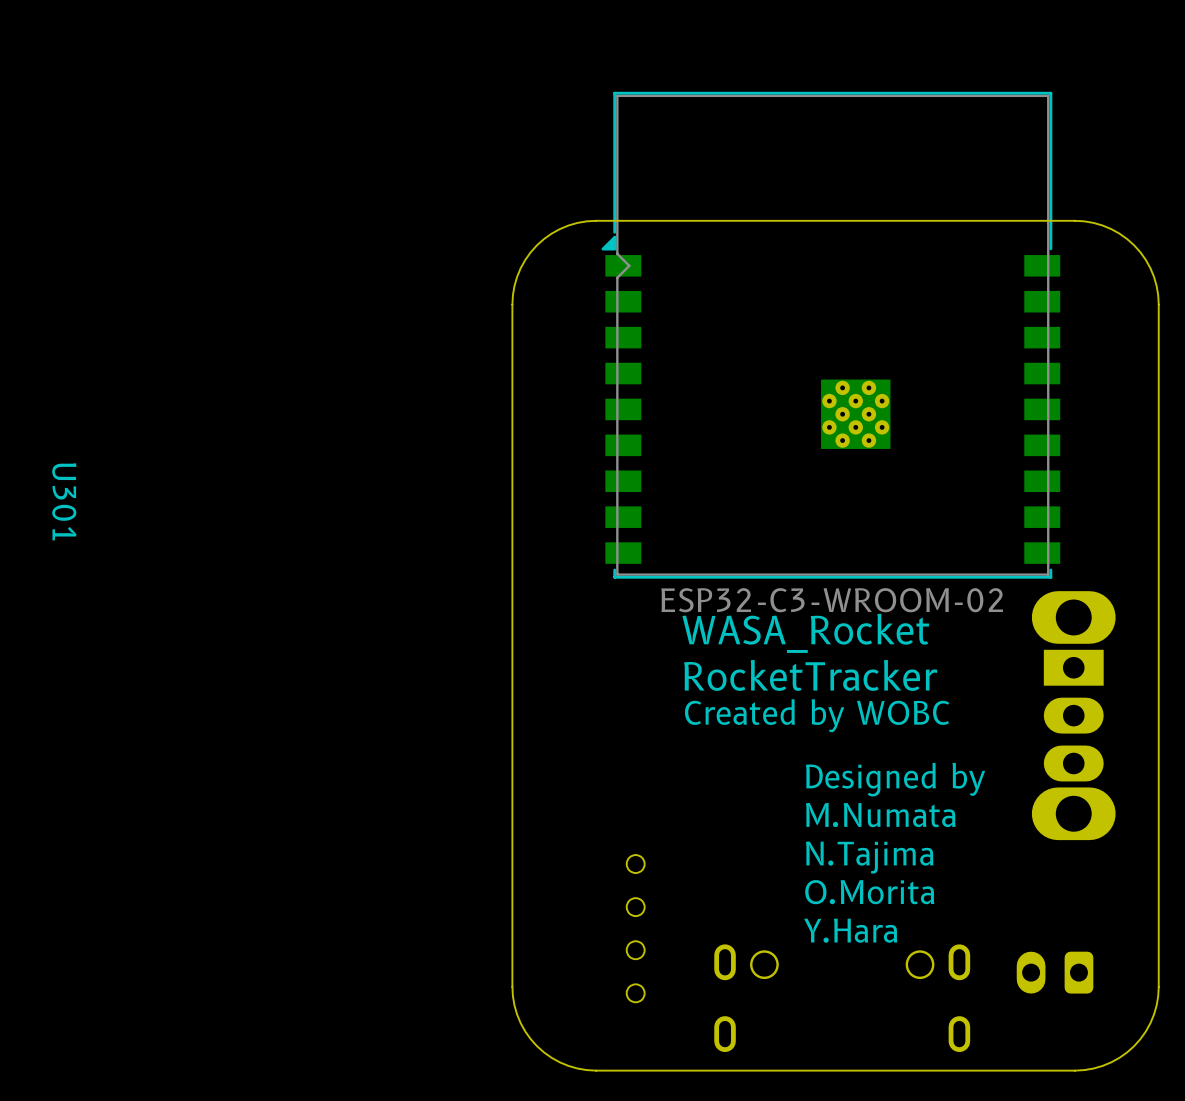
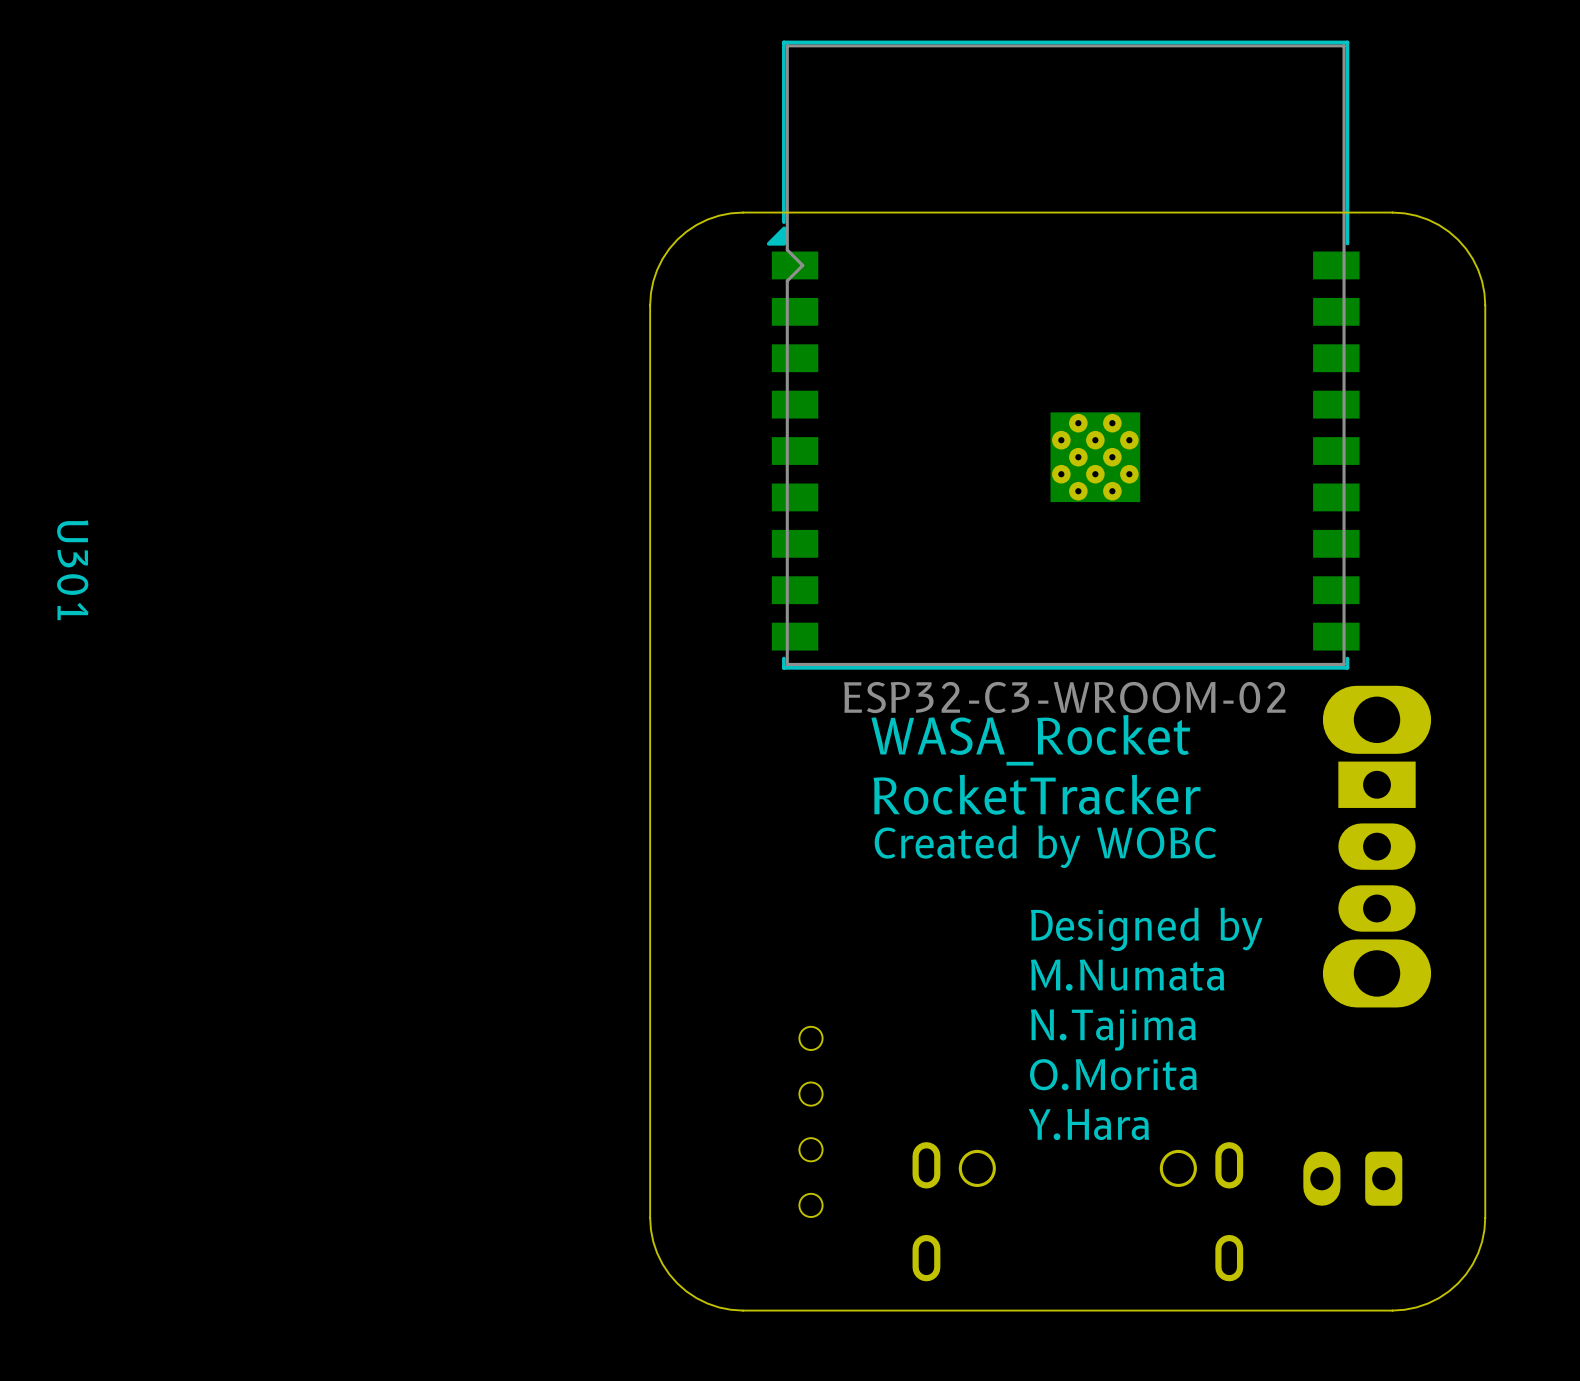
drawing: [511, 220, 1160, 1072] -> none
board edge: none -> (1392, 212) (742, 212) (718, 215) (696, 224) (677, 239) (662, 258) (653, 281) (650, 305) (650, 1217) (653, 1241) (662, 1264) (677, 1283) (696, 1298) (718, 1307) (742, 1310) (1392, 1310) (1416, 1307) (1438, 1298) (1458, 1283) (1472, 1264) (1482, 1241) (1485, 1217) (1484, 293) (1482, 281) (1472, 258) (1458, 239) (1448, 231) (1438, 224) (1416, 215) (1392, 212)

